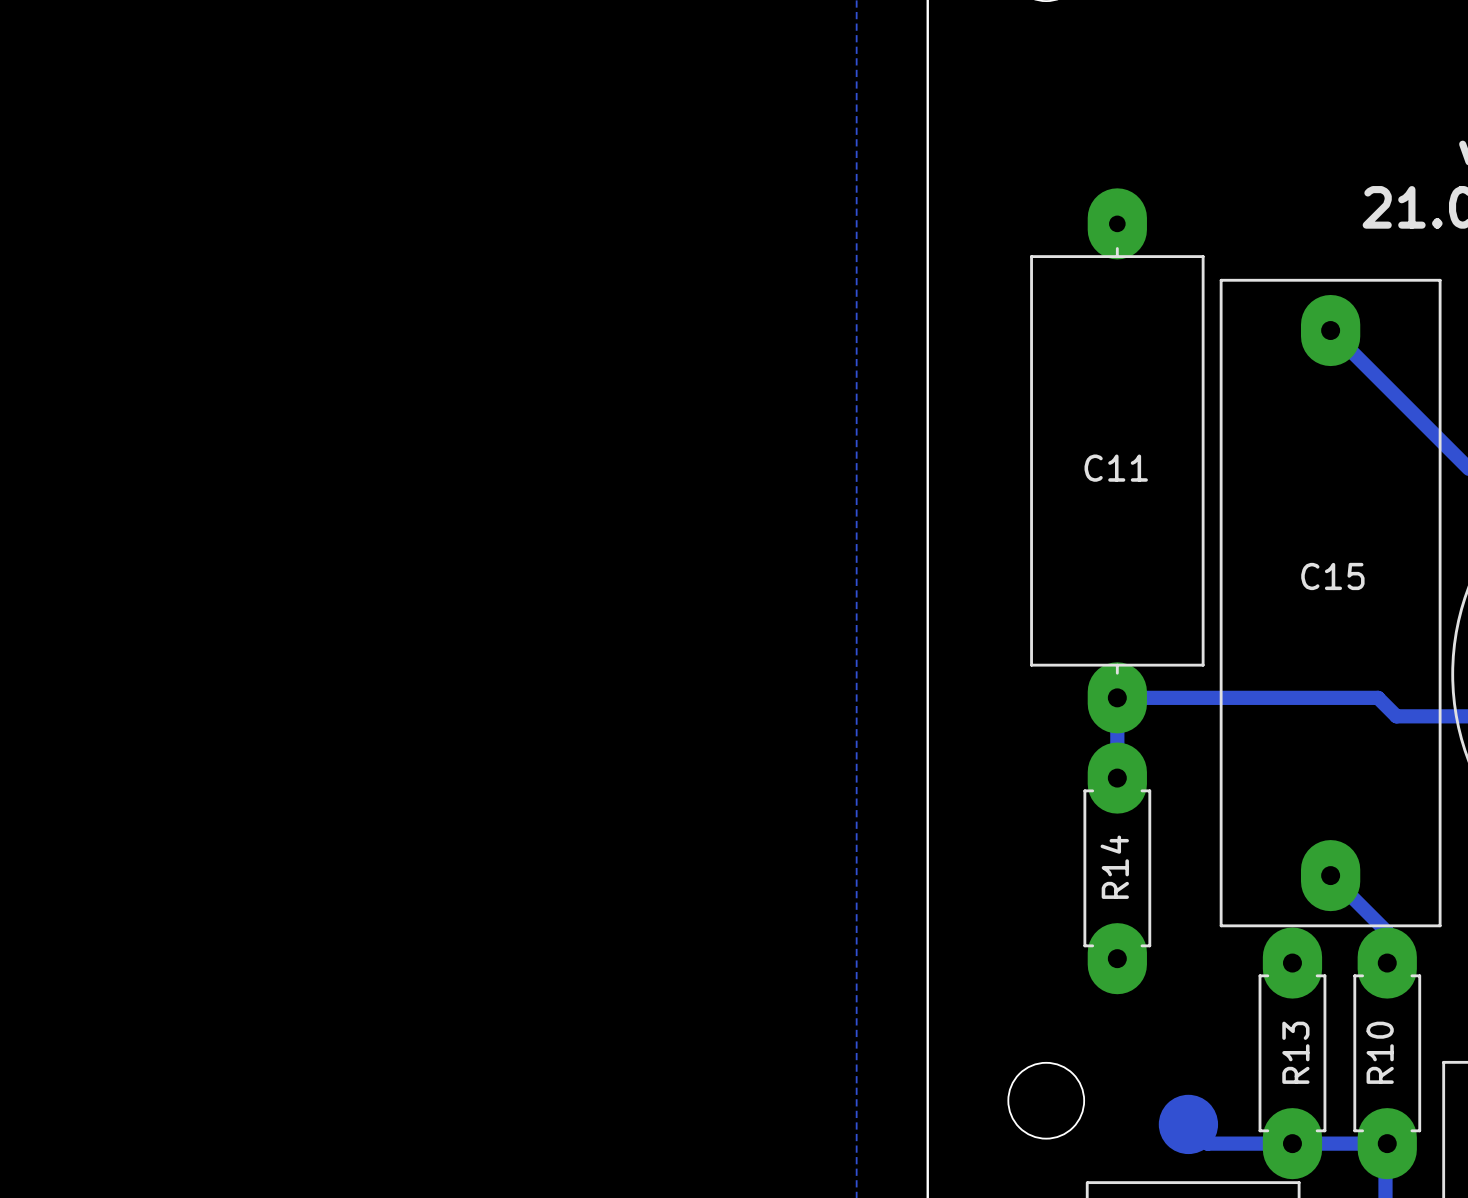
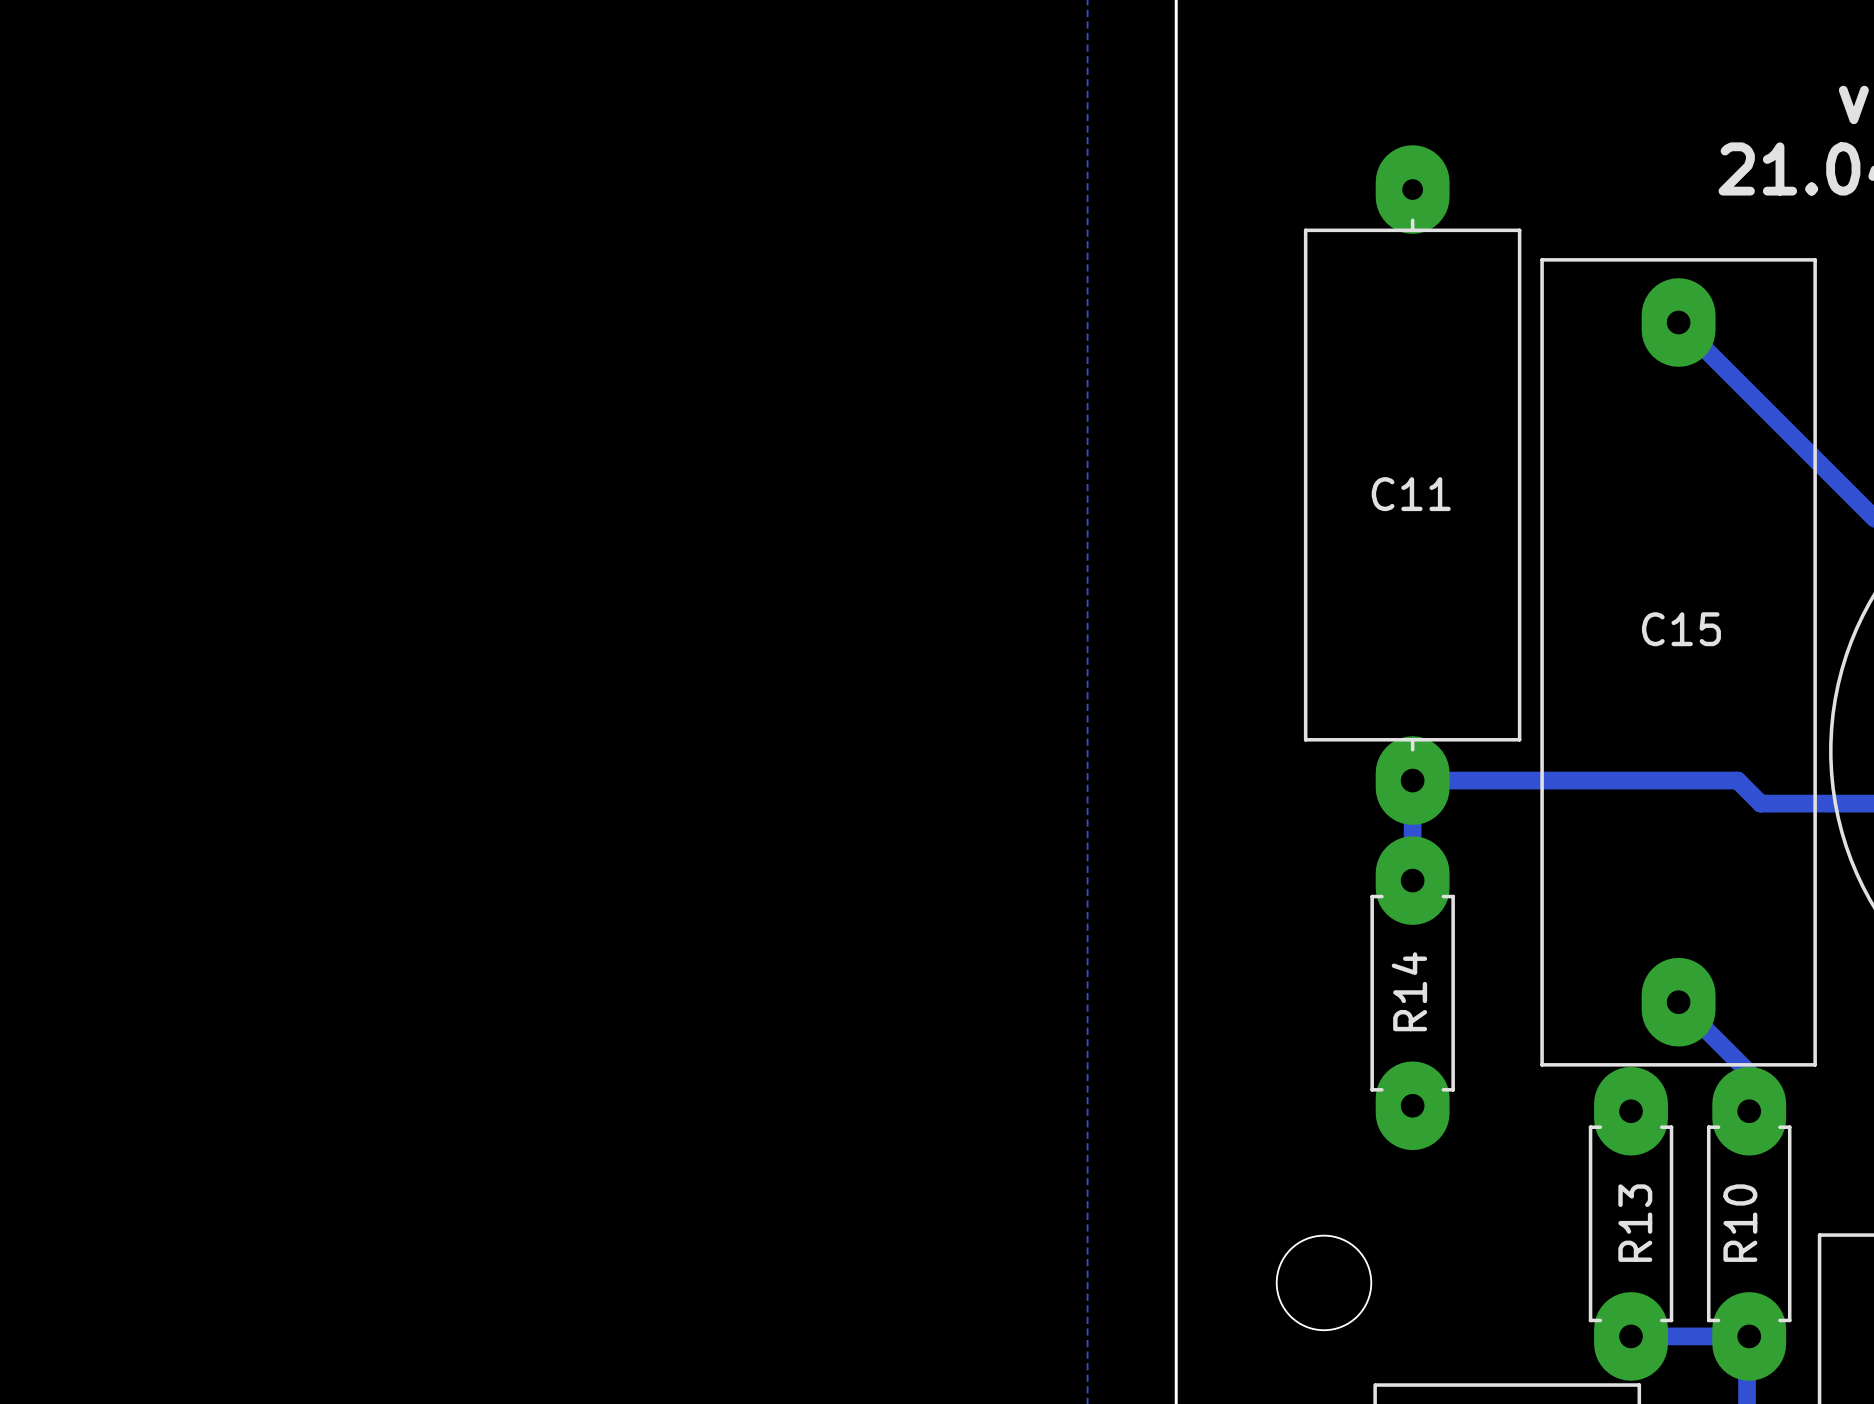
bottom track: (1188, 1124) (1207, 1143) (1292, 1143) -> none
part: (1188, 1124) -> none

